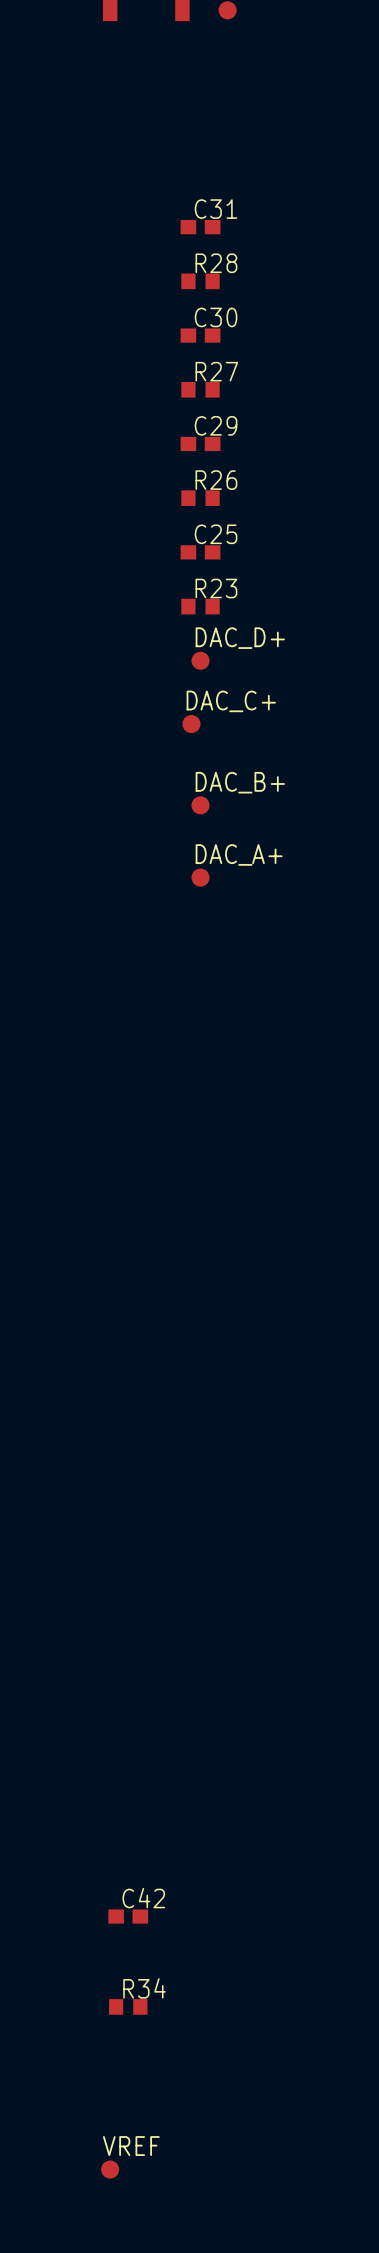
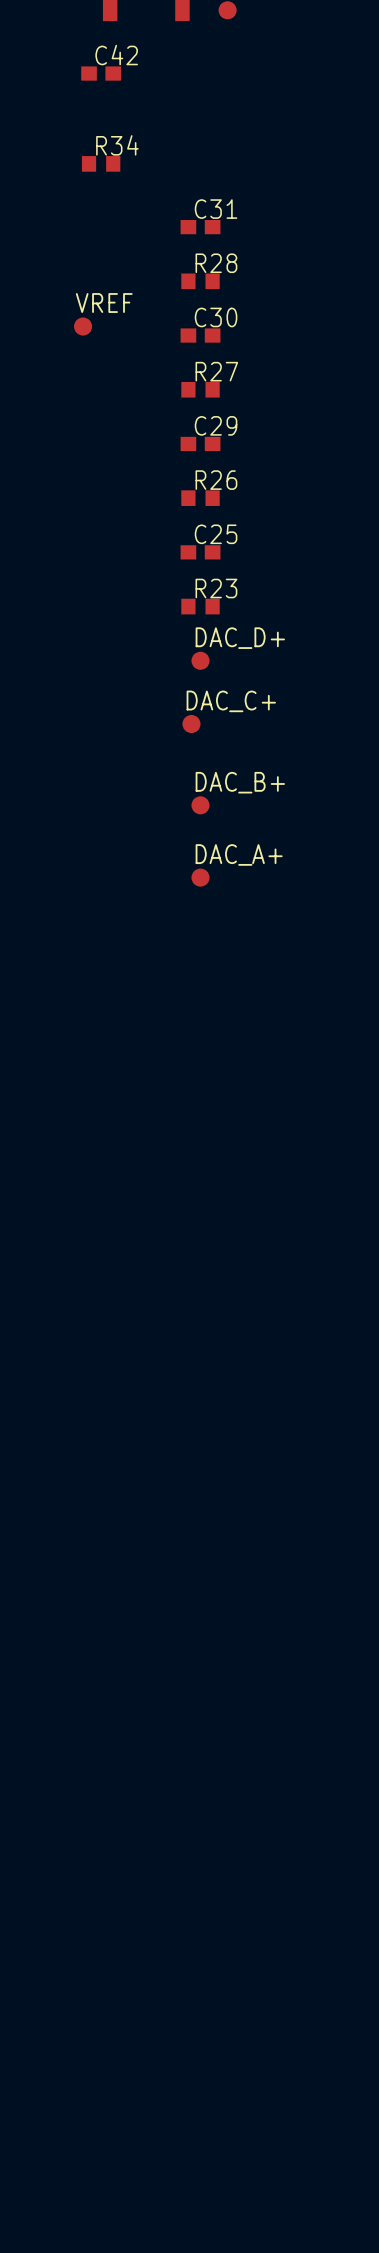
VREF: none -> (83, 326)
C42 position: (128, 1916) -> (101, 73)
R34 position: (128, 2006) -> (101, 163)
VREF: (110, 2169) -> none

